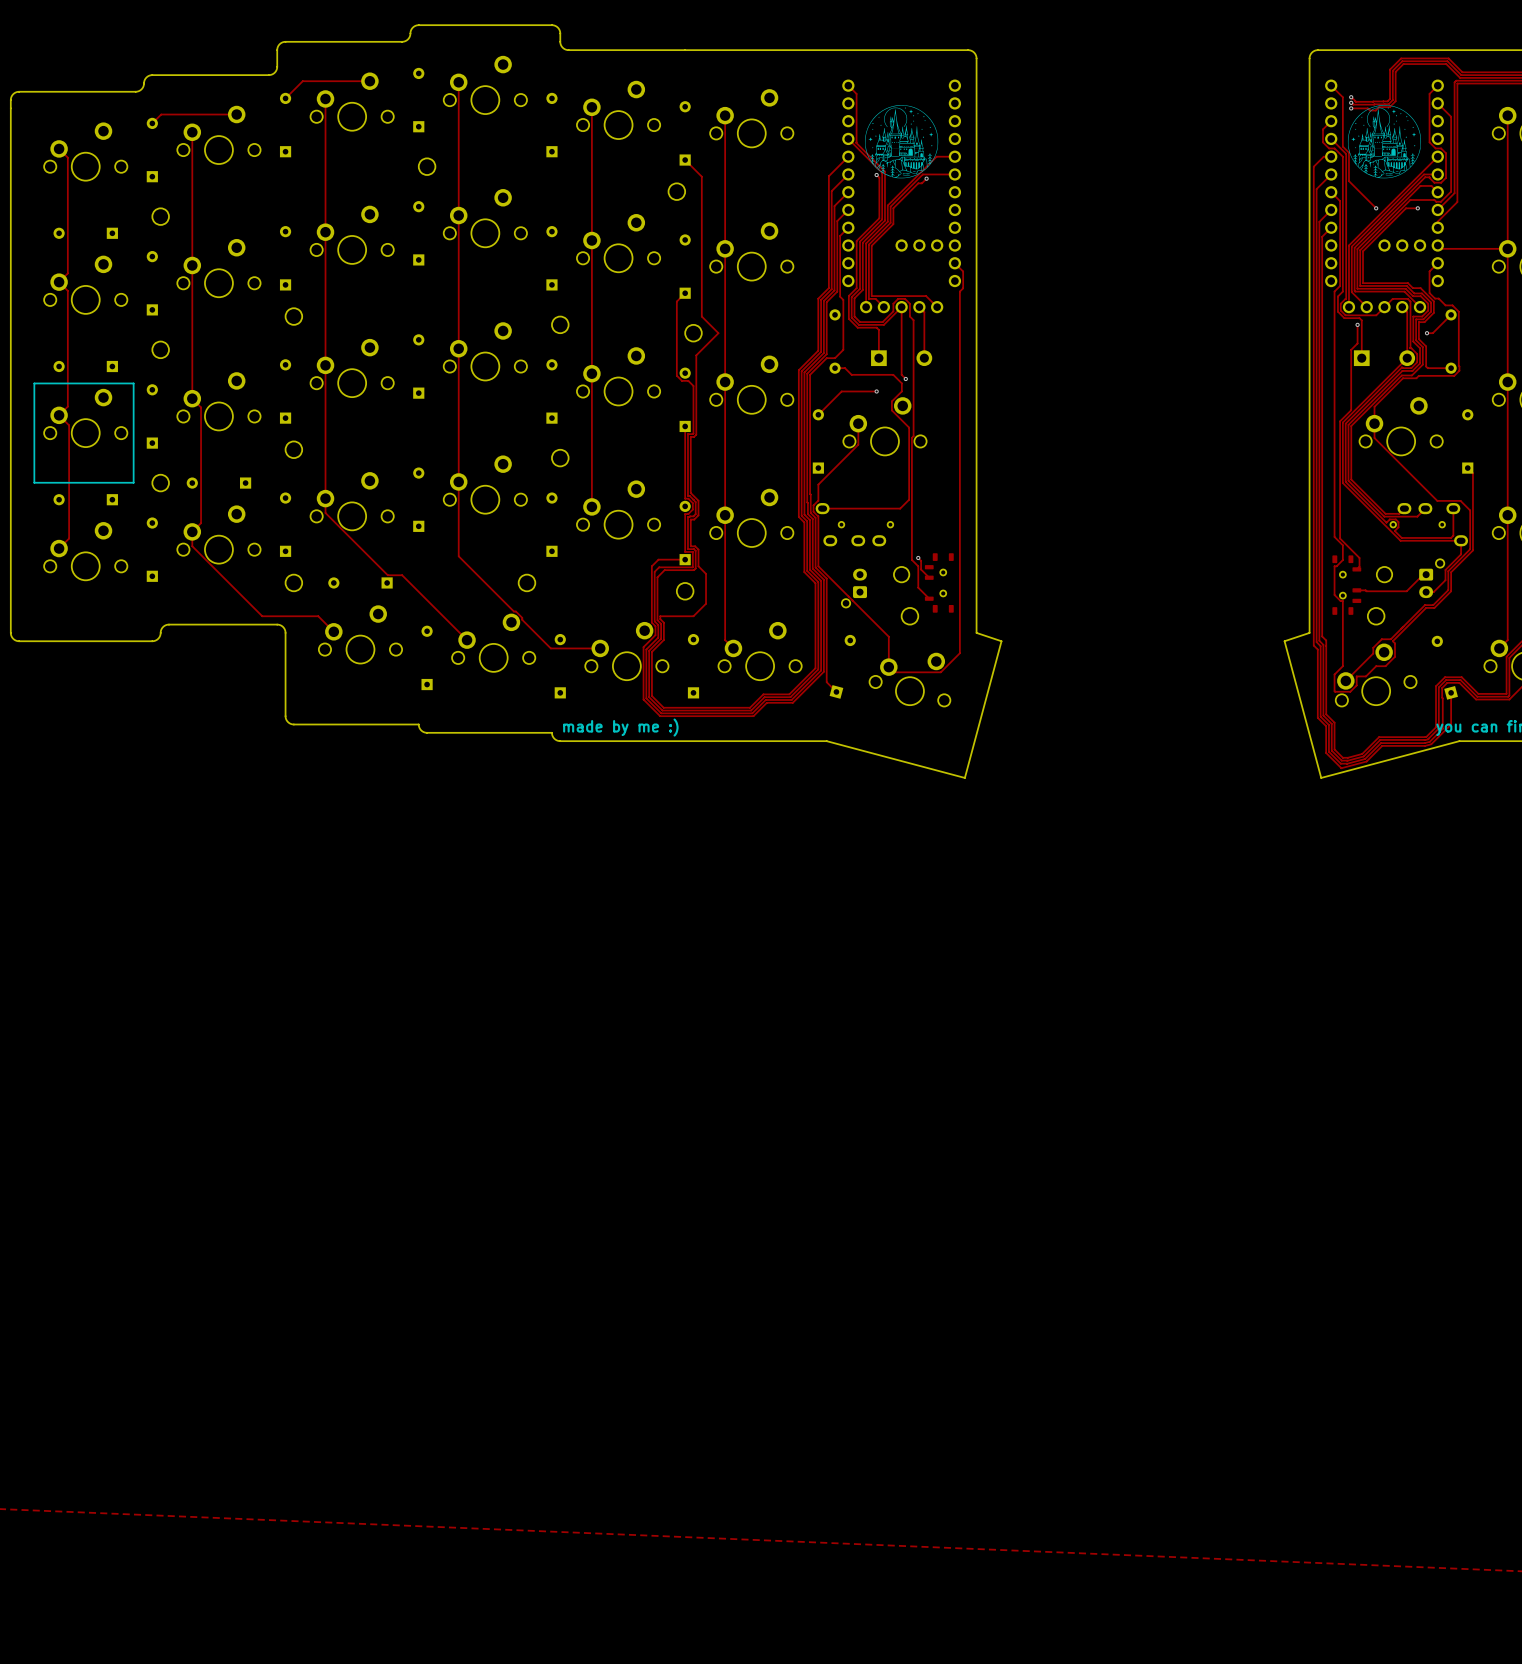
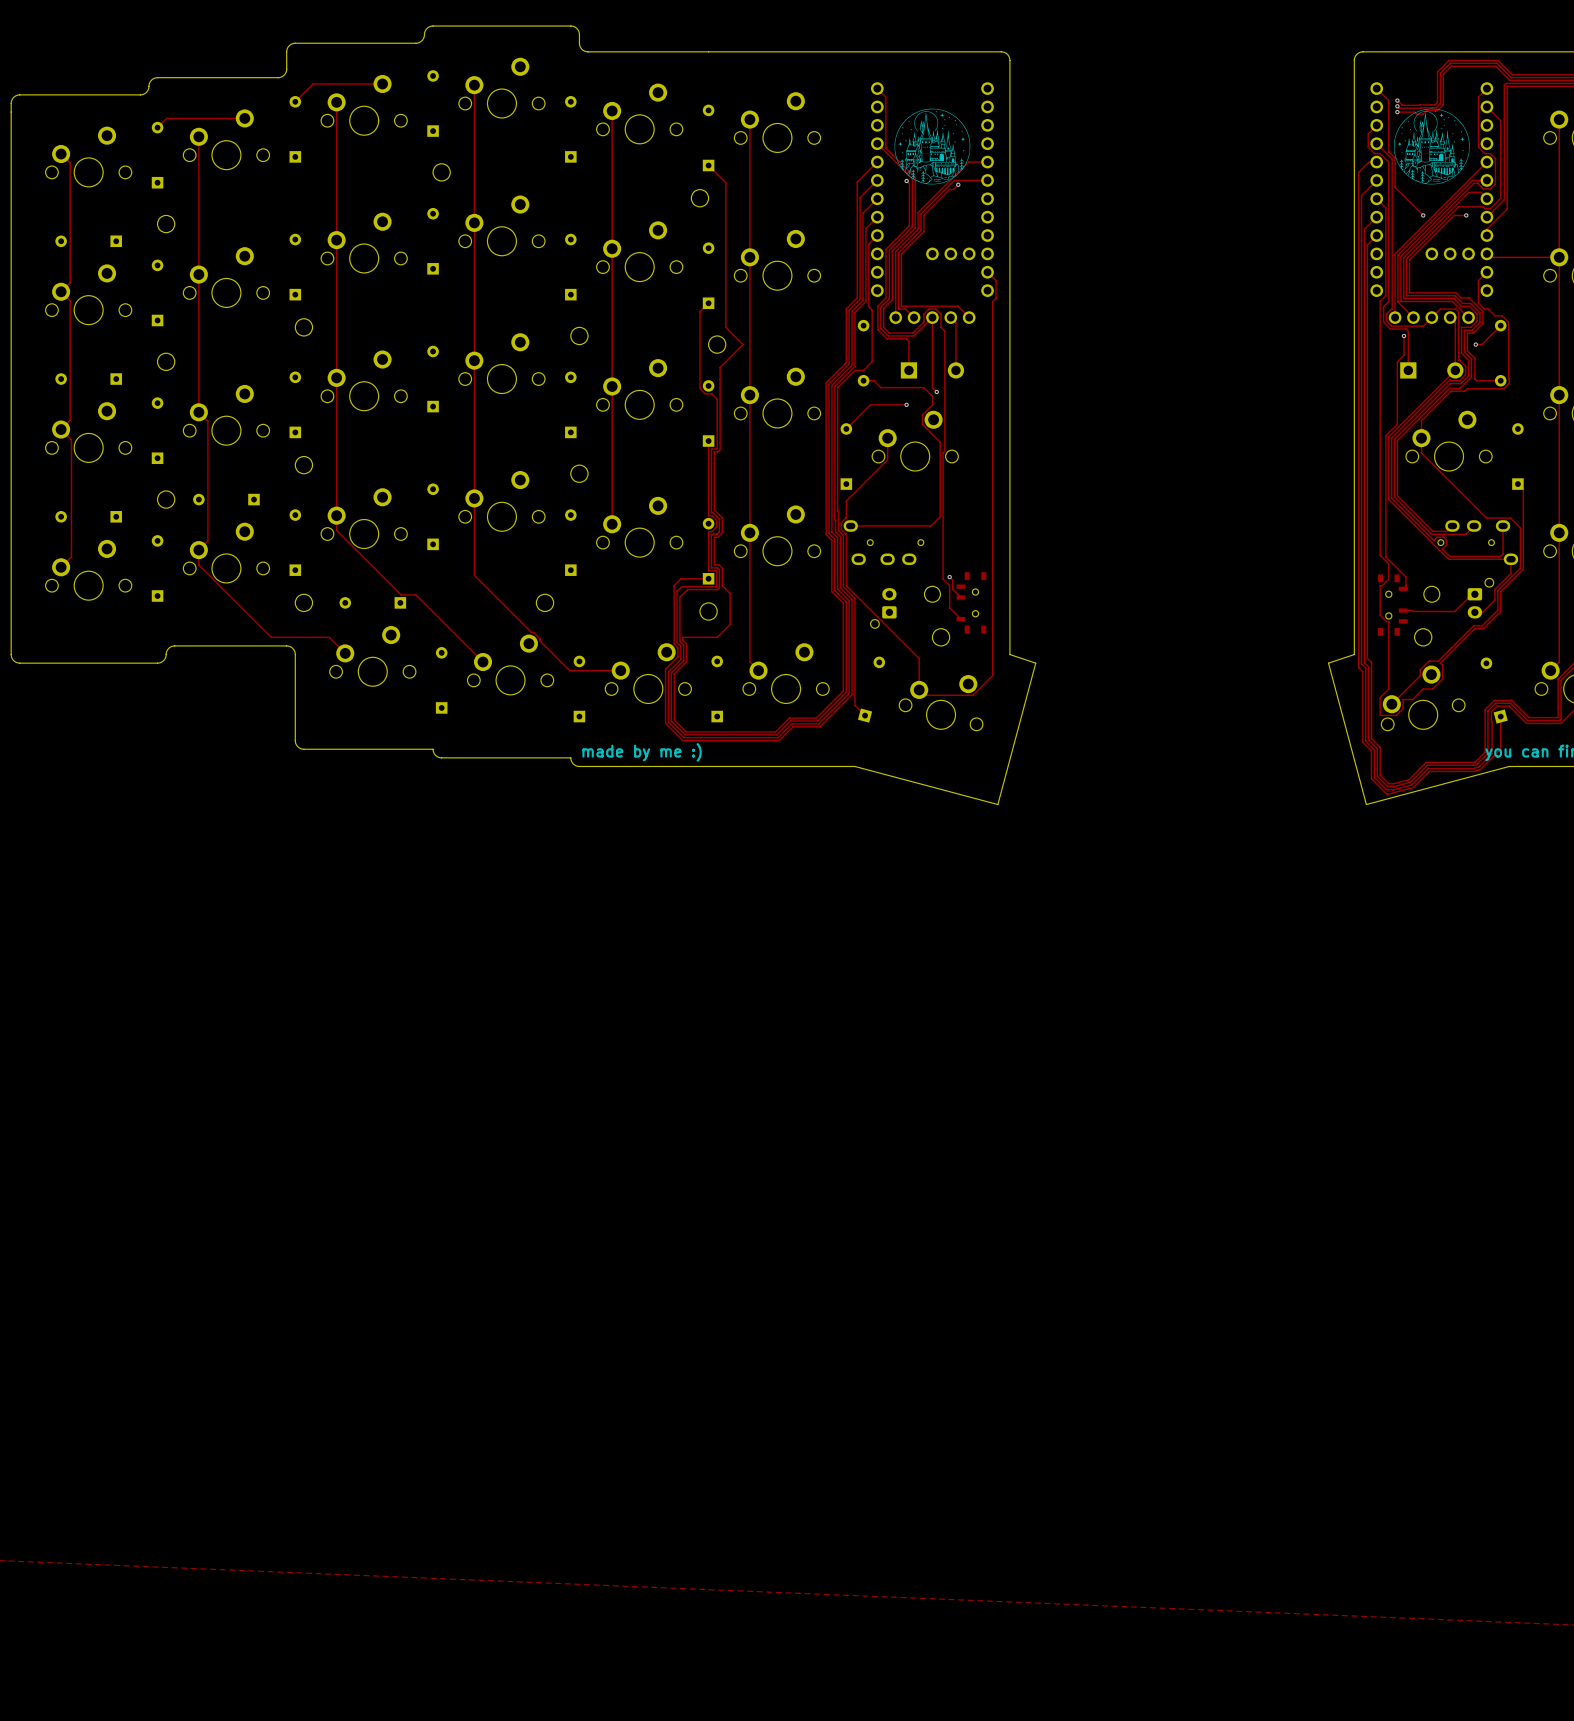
part: (83, 433) -> none

